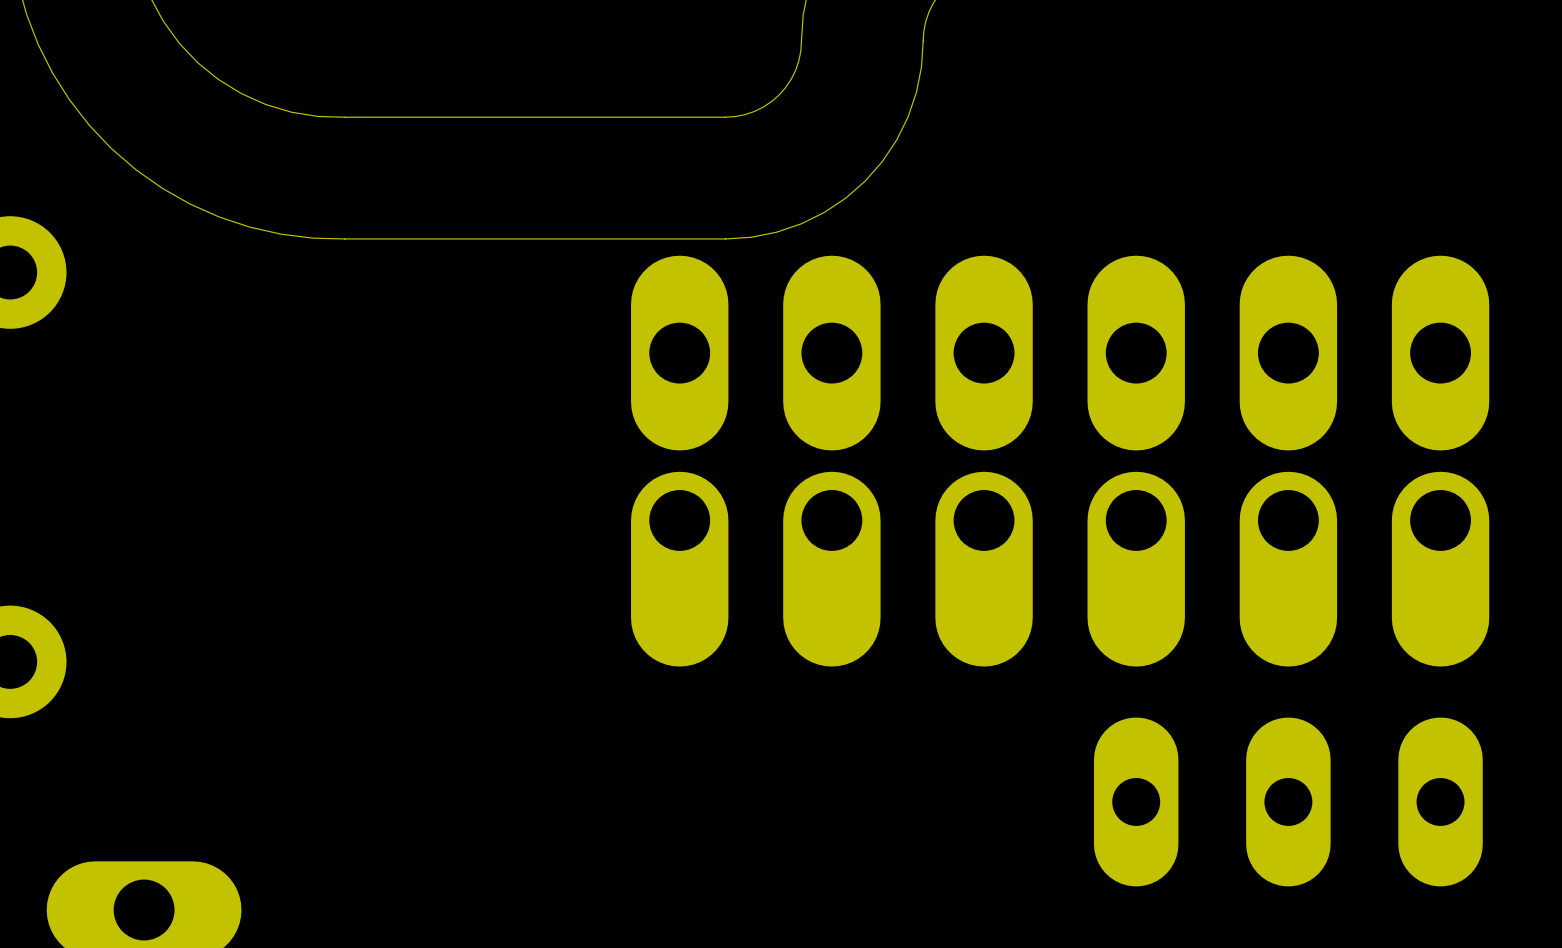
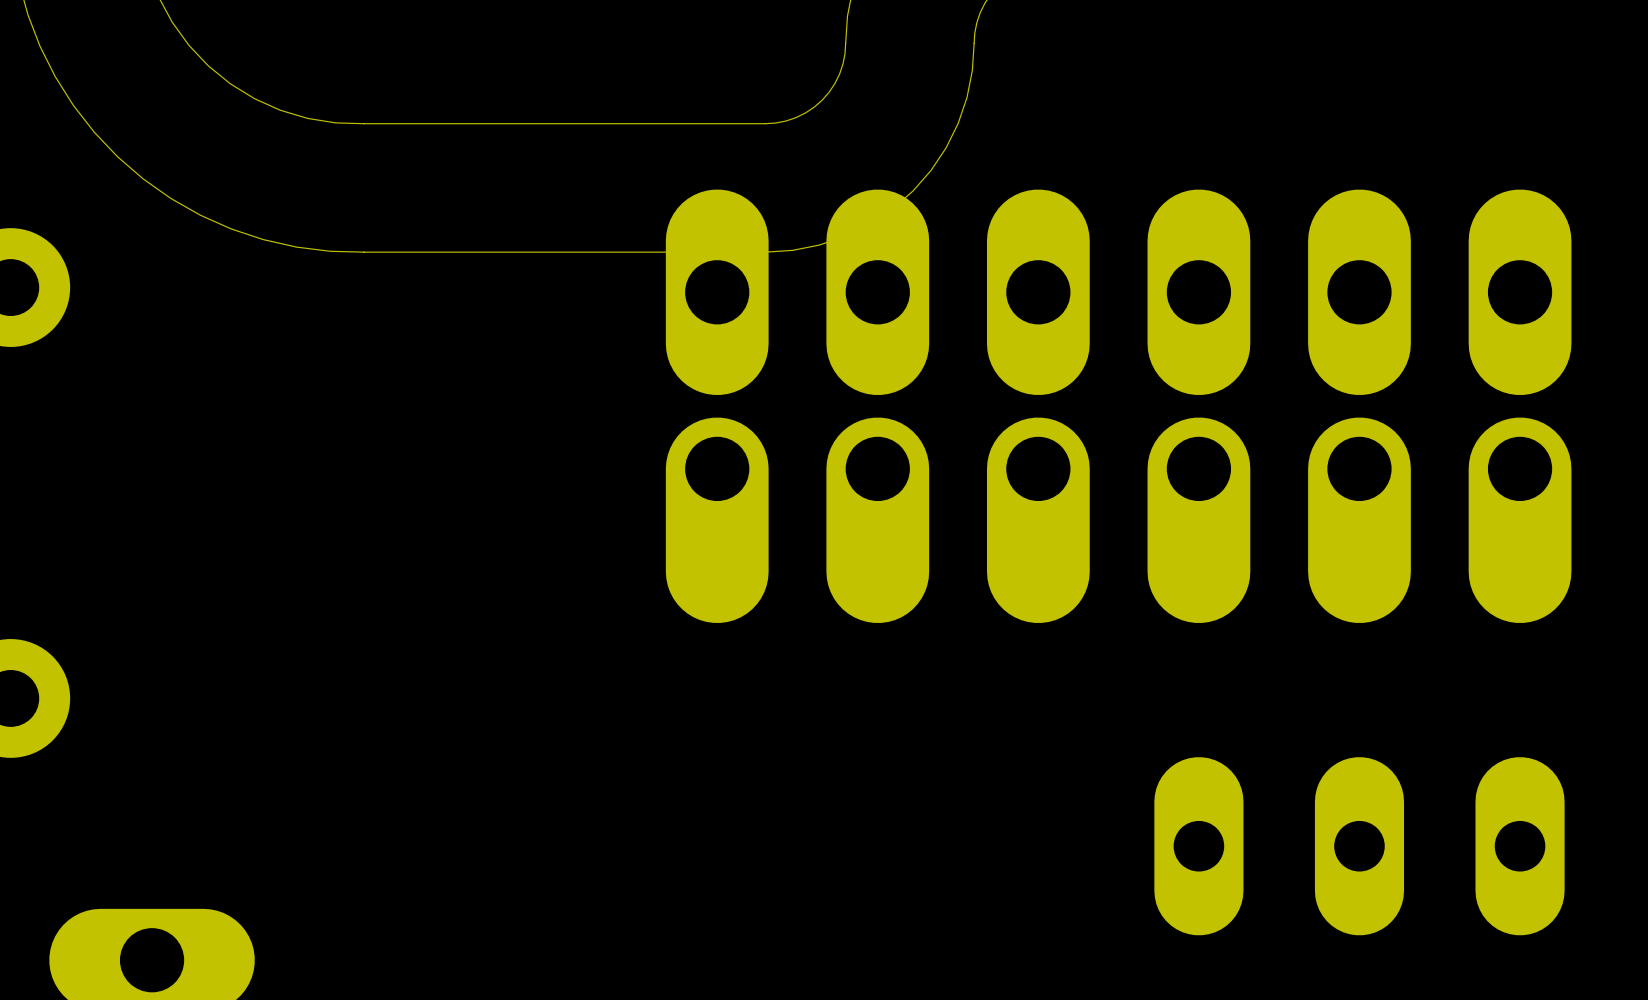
part position: (1060, 461) -> (1118, 406)

